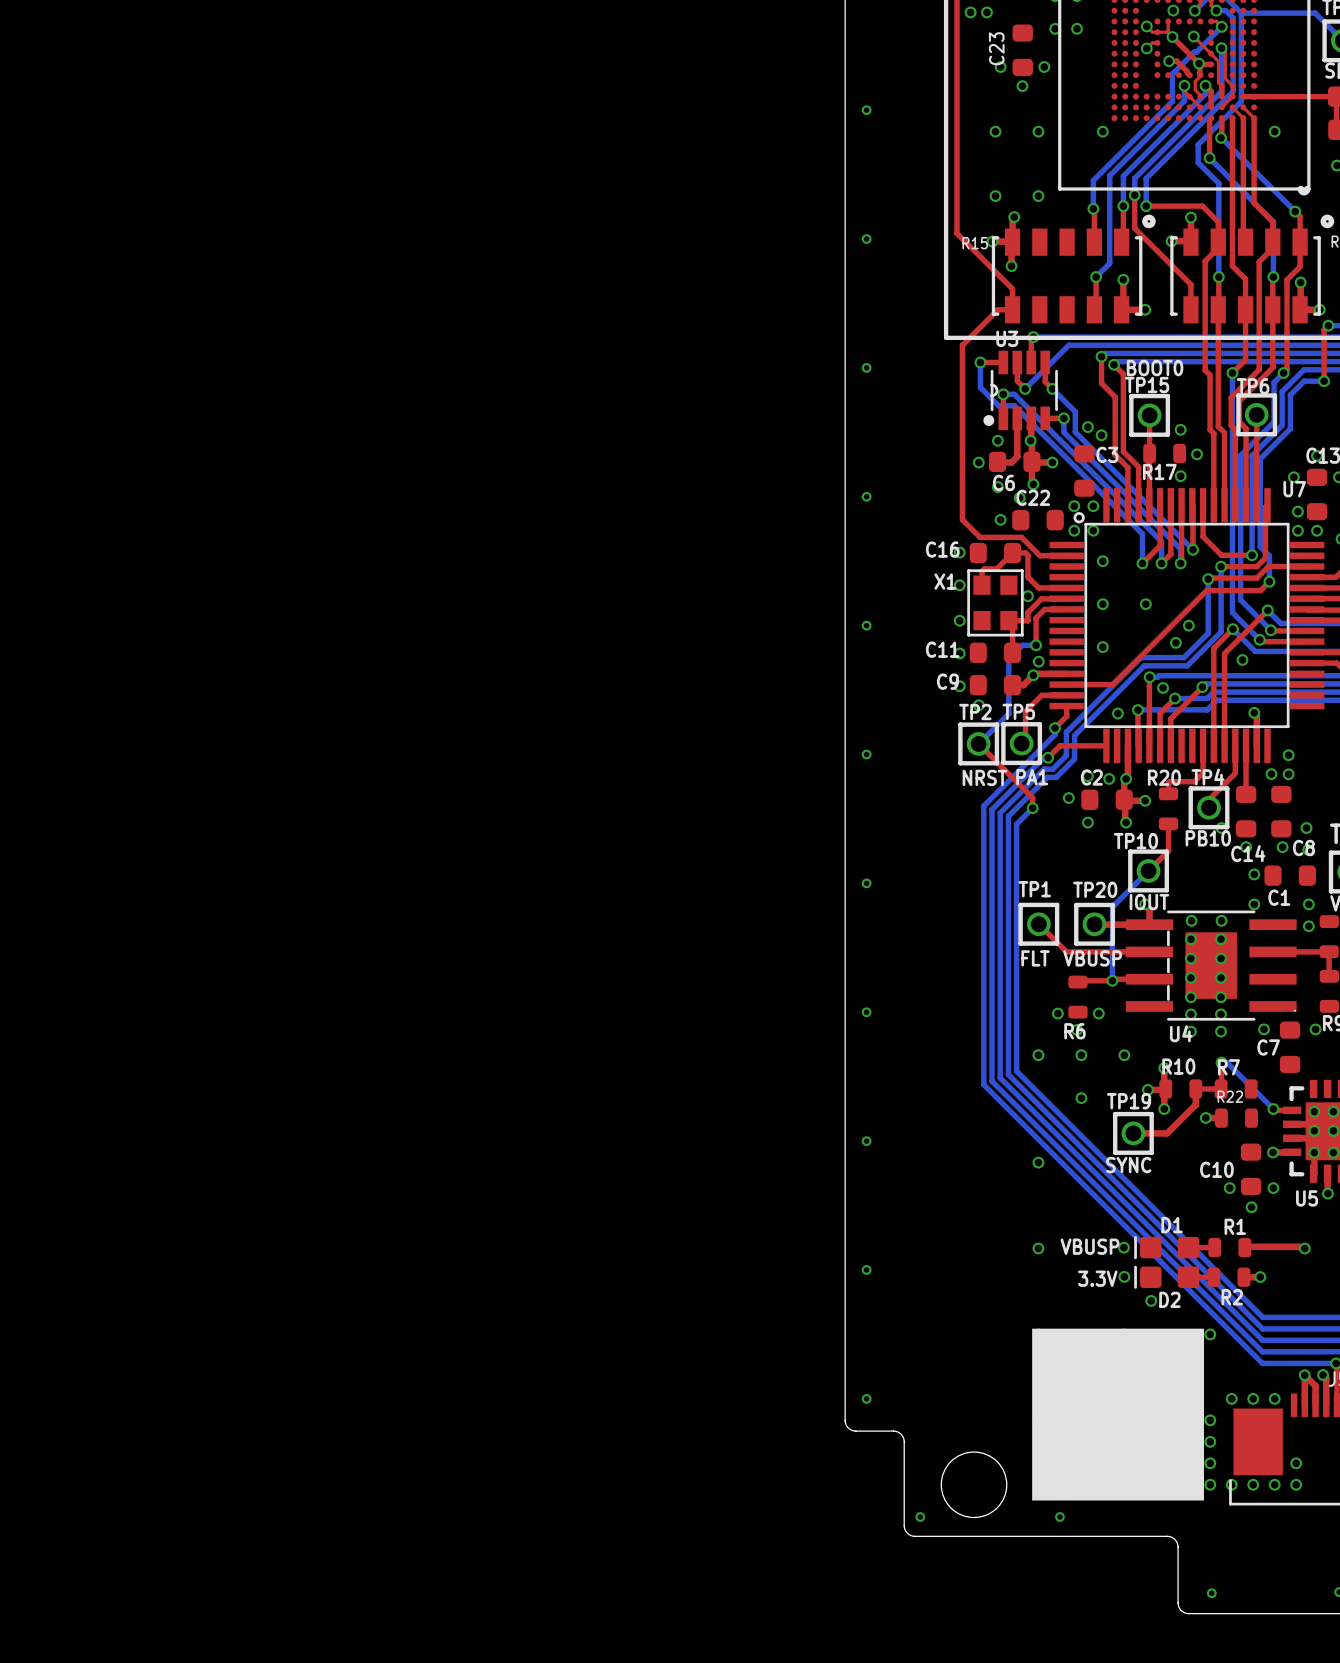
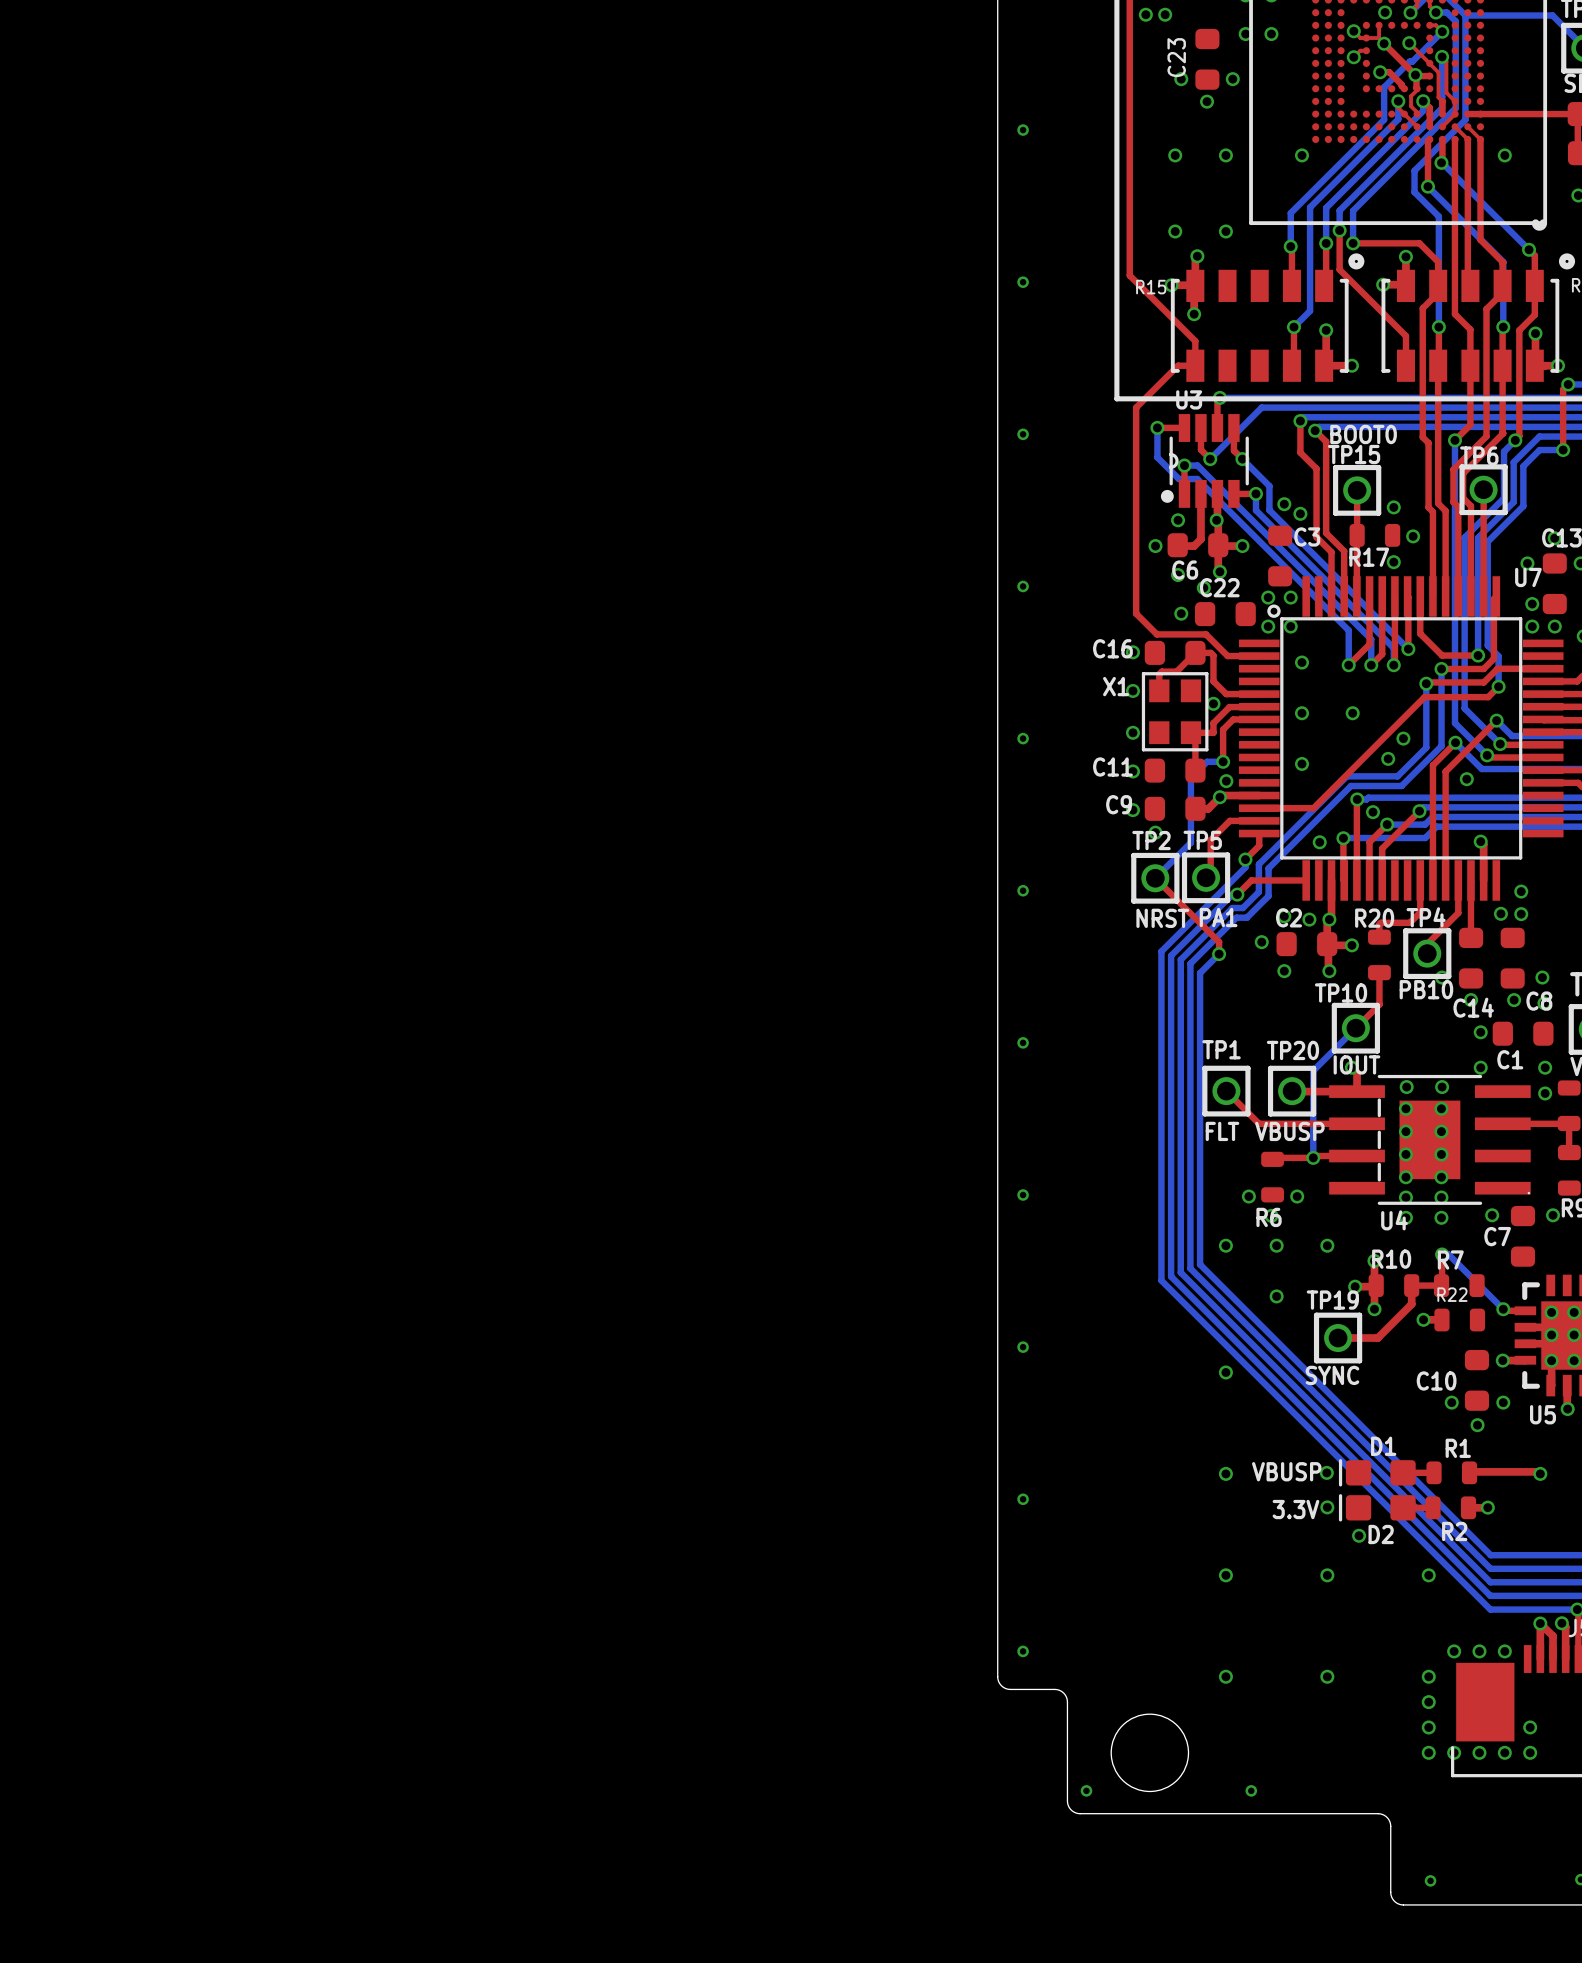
drawing: [1032, 1328, 1204, 1501] -> none

